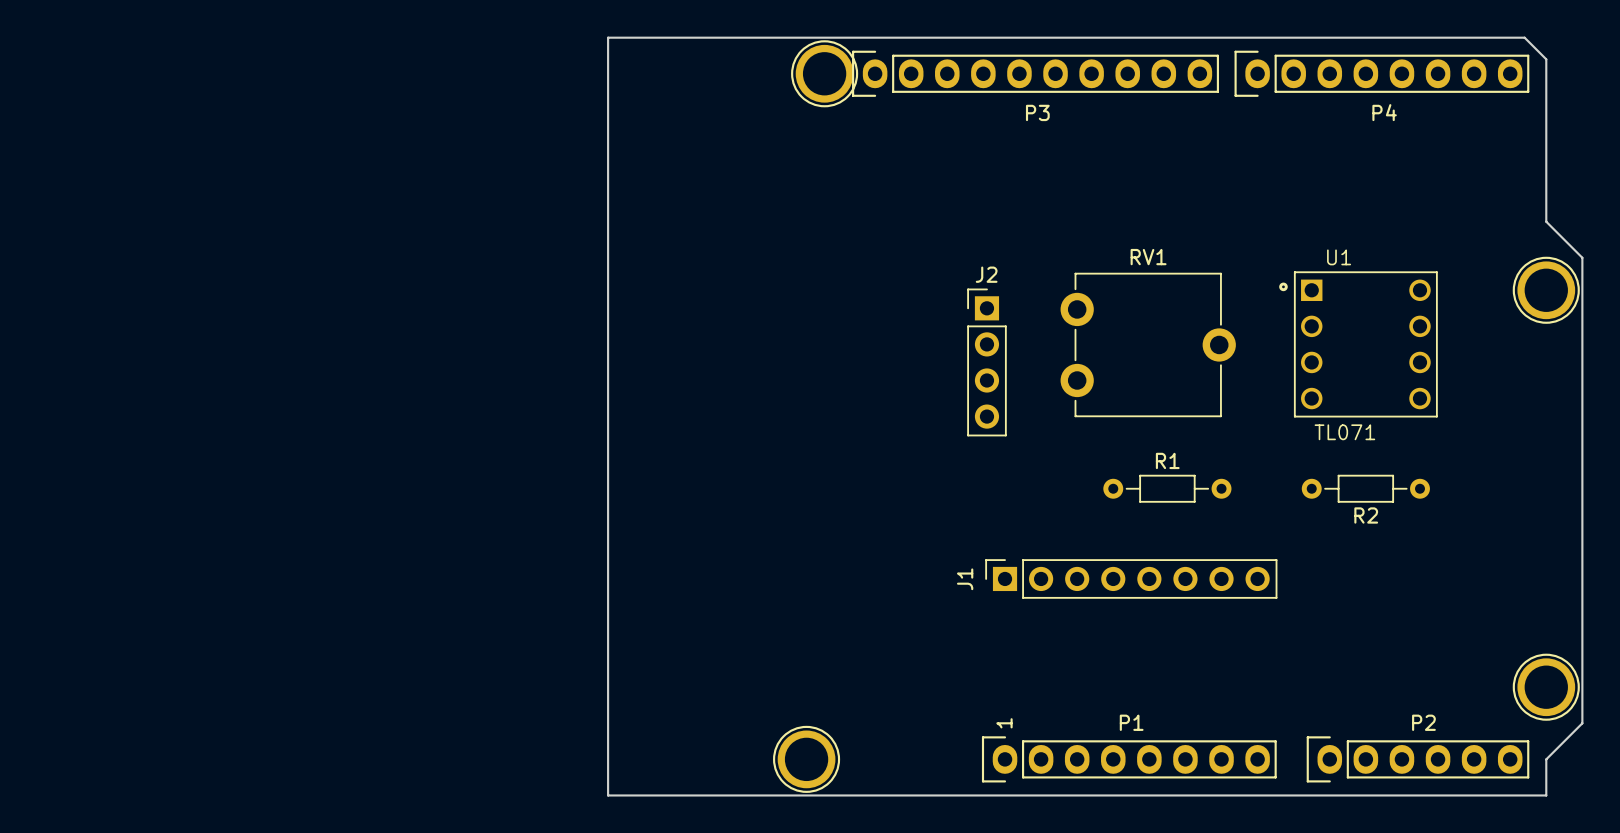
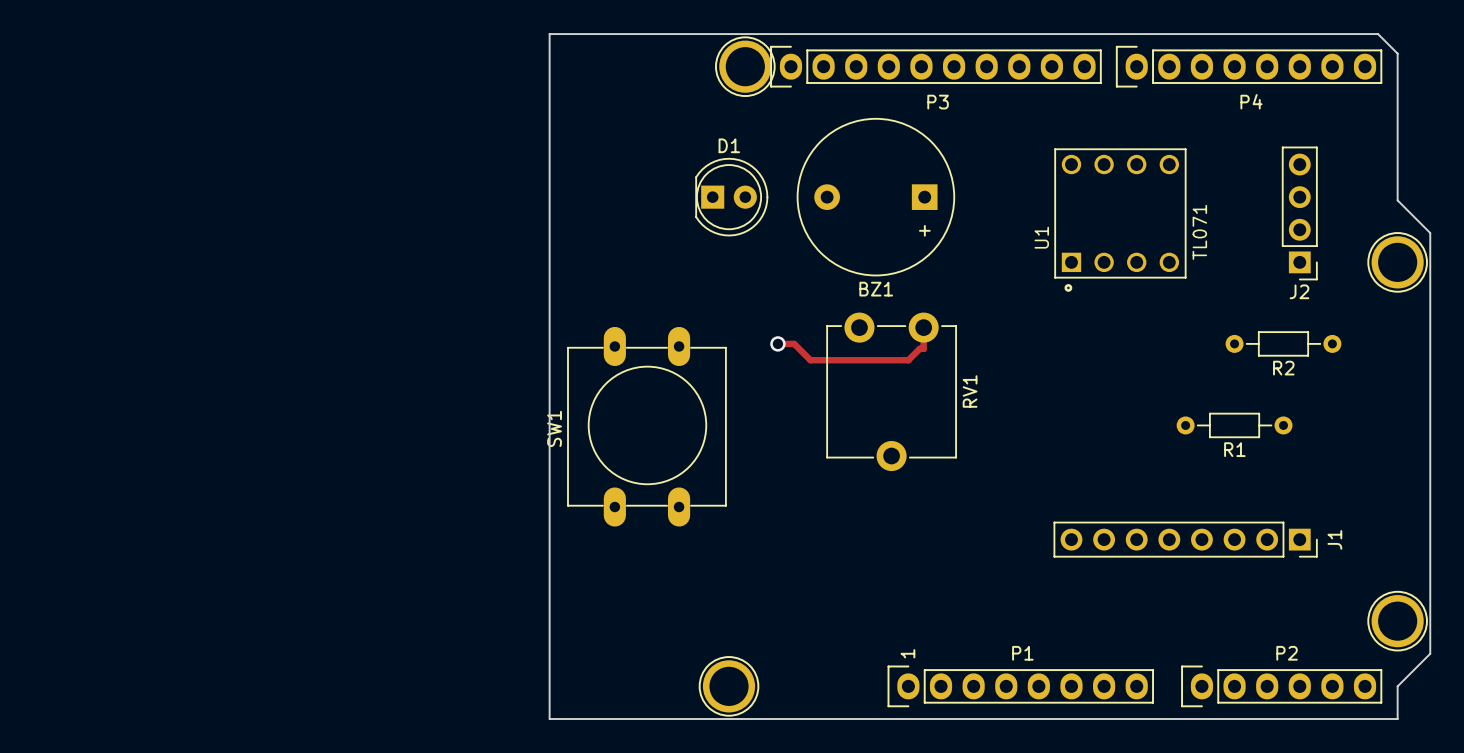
D1: none -> (731, 197)
BZ1: none -> (875, 197)
RV1 rotation: 0° (1148, 344) -> 90° clockwise (891, 391)
RV1 position: (1148, 344) -> (891, 391)
U1 rotation: 0° (1358, 344) -> 90° counterclockwise (1120, 220)
U1 position: (1358, 344) -> (1120, 220)
J2 rotation: 0° (986, 362) -> 180° (1299, 213)
J2 position: (986, 362) -> (1299, 213)
track: none -> (923, 327) (923, 348) (919, 348) (908, 360) (810, 360) (794, 343) (777, 343)
via: none -> (777, 343)
R1 name position: R1 (1167, 460) -> R1 (1234, 449)
SW1: none -> (646, 426)
R1 position: (1167, 488) -> (1234, 425)
R2 position: (1365, 488) -> (1283, 343)
J1 rotation: 0° (1131, 578) -> 180° (1185, 539)
J1 position: (1131, 578) -> (1185, 539)

